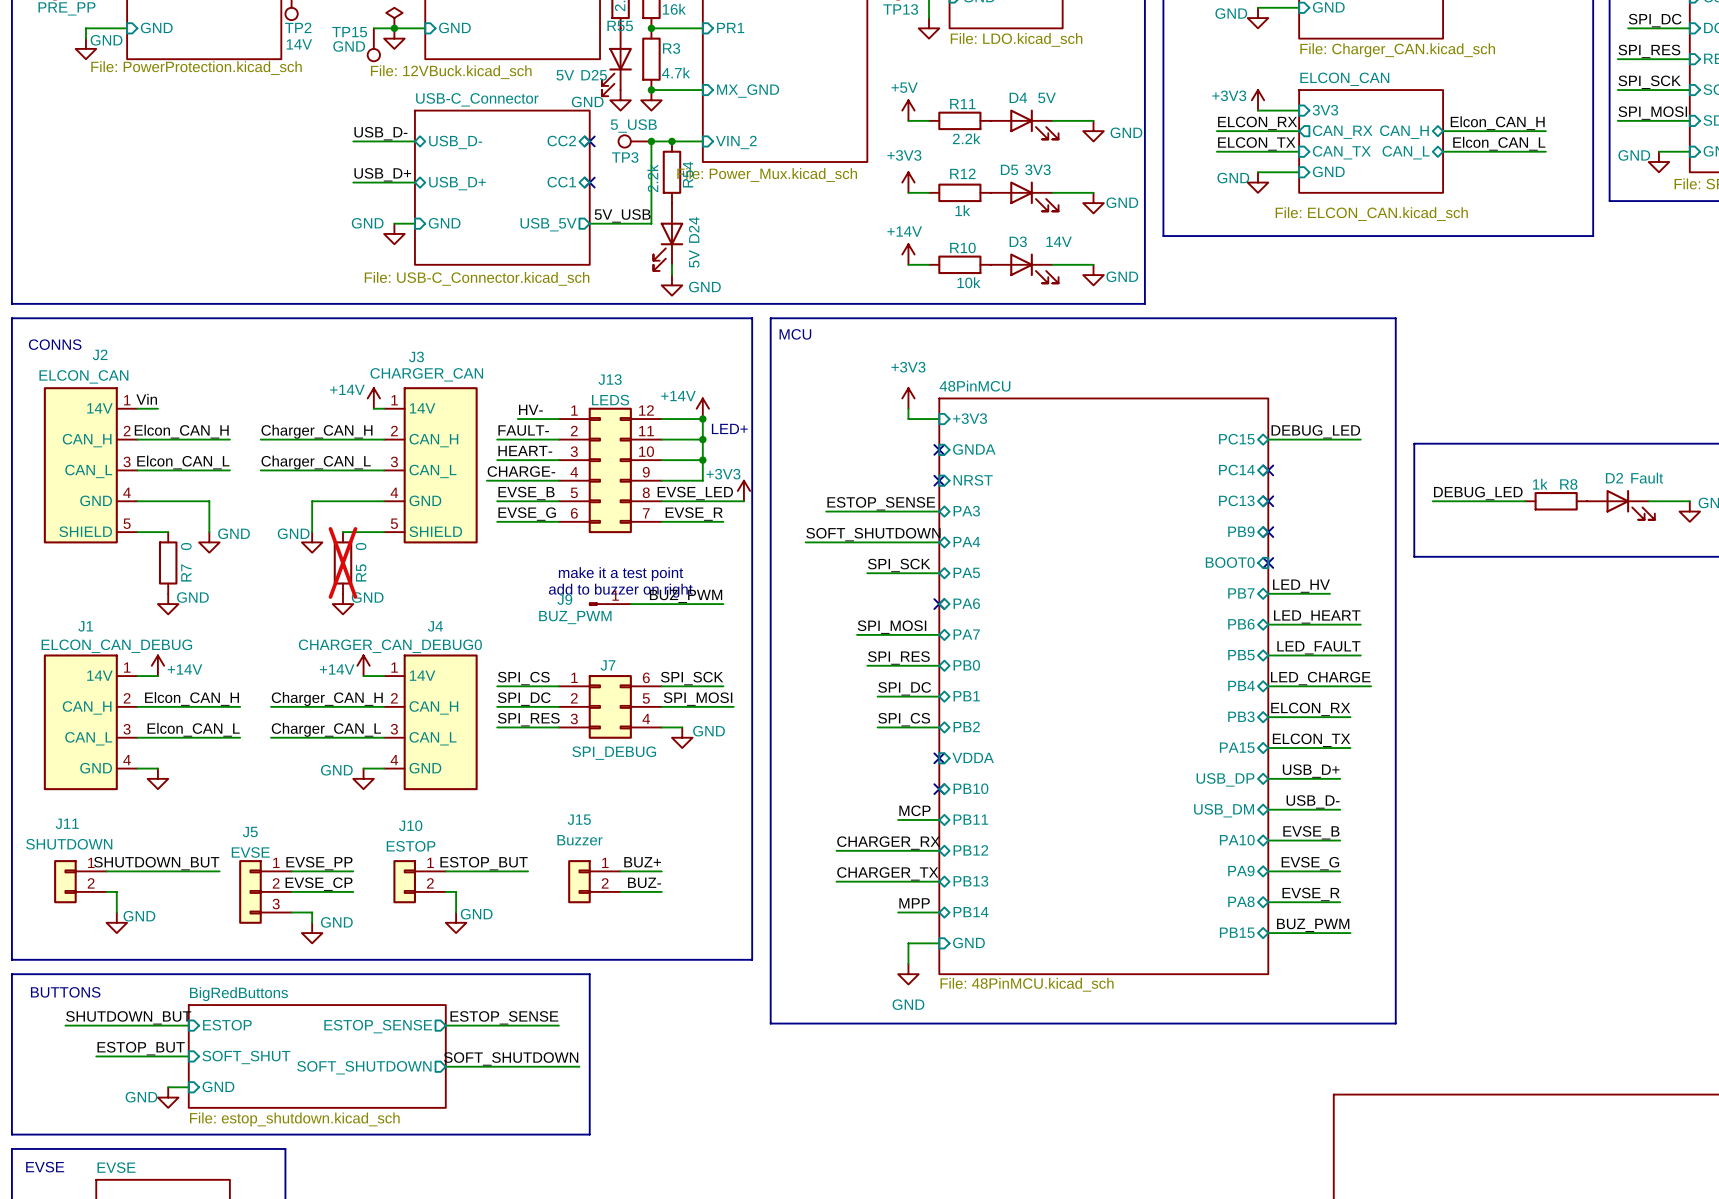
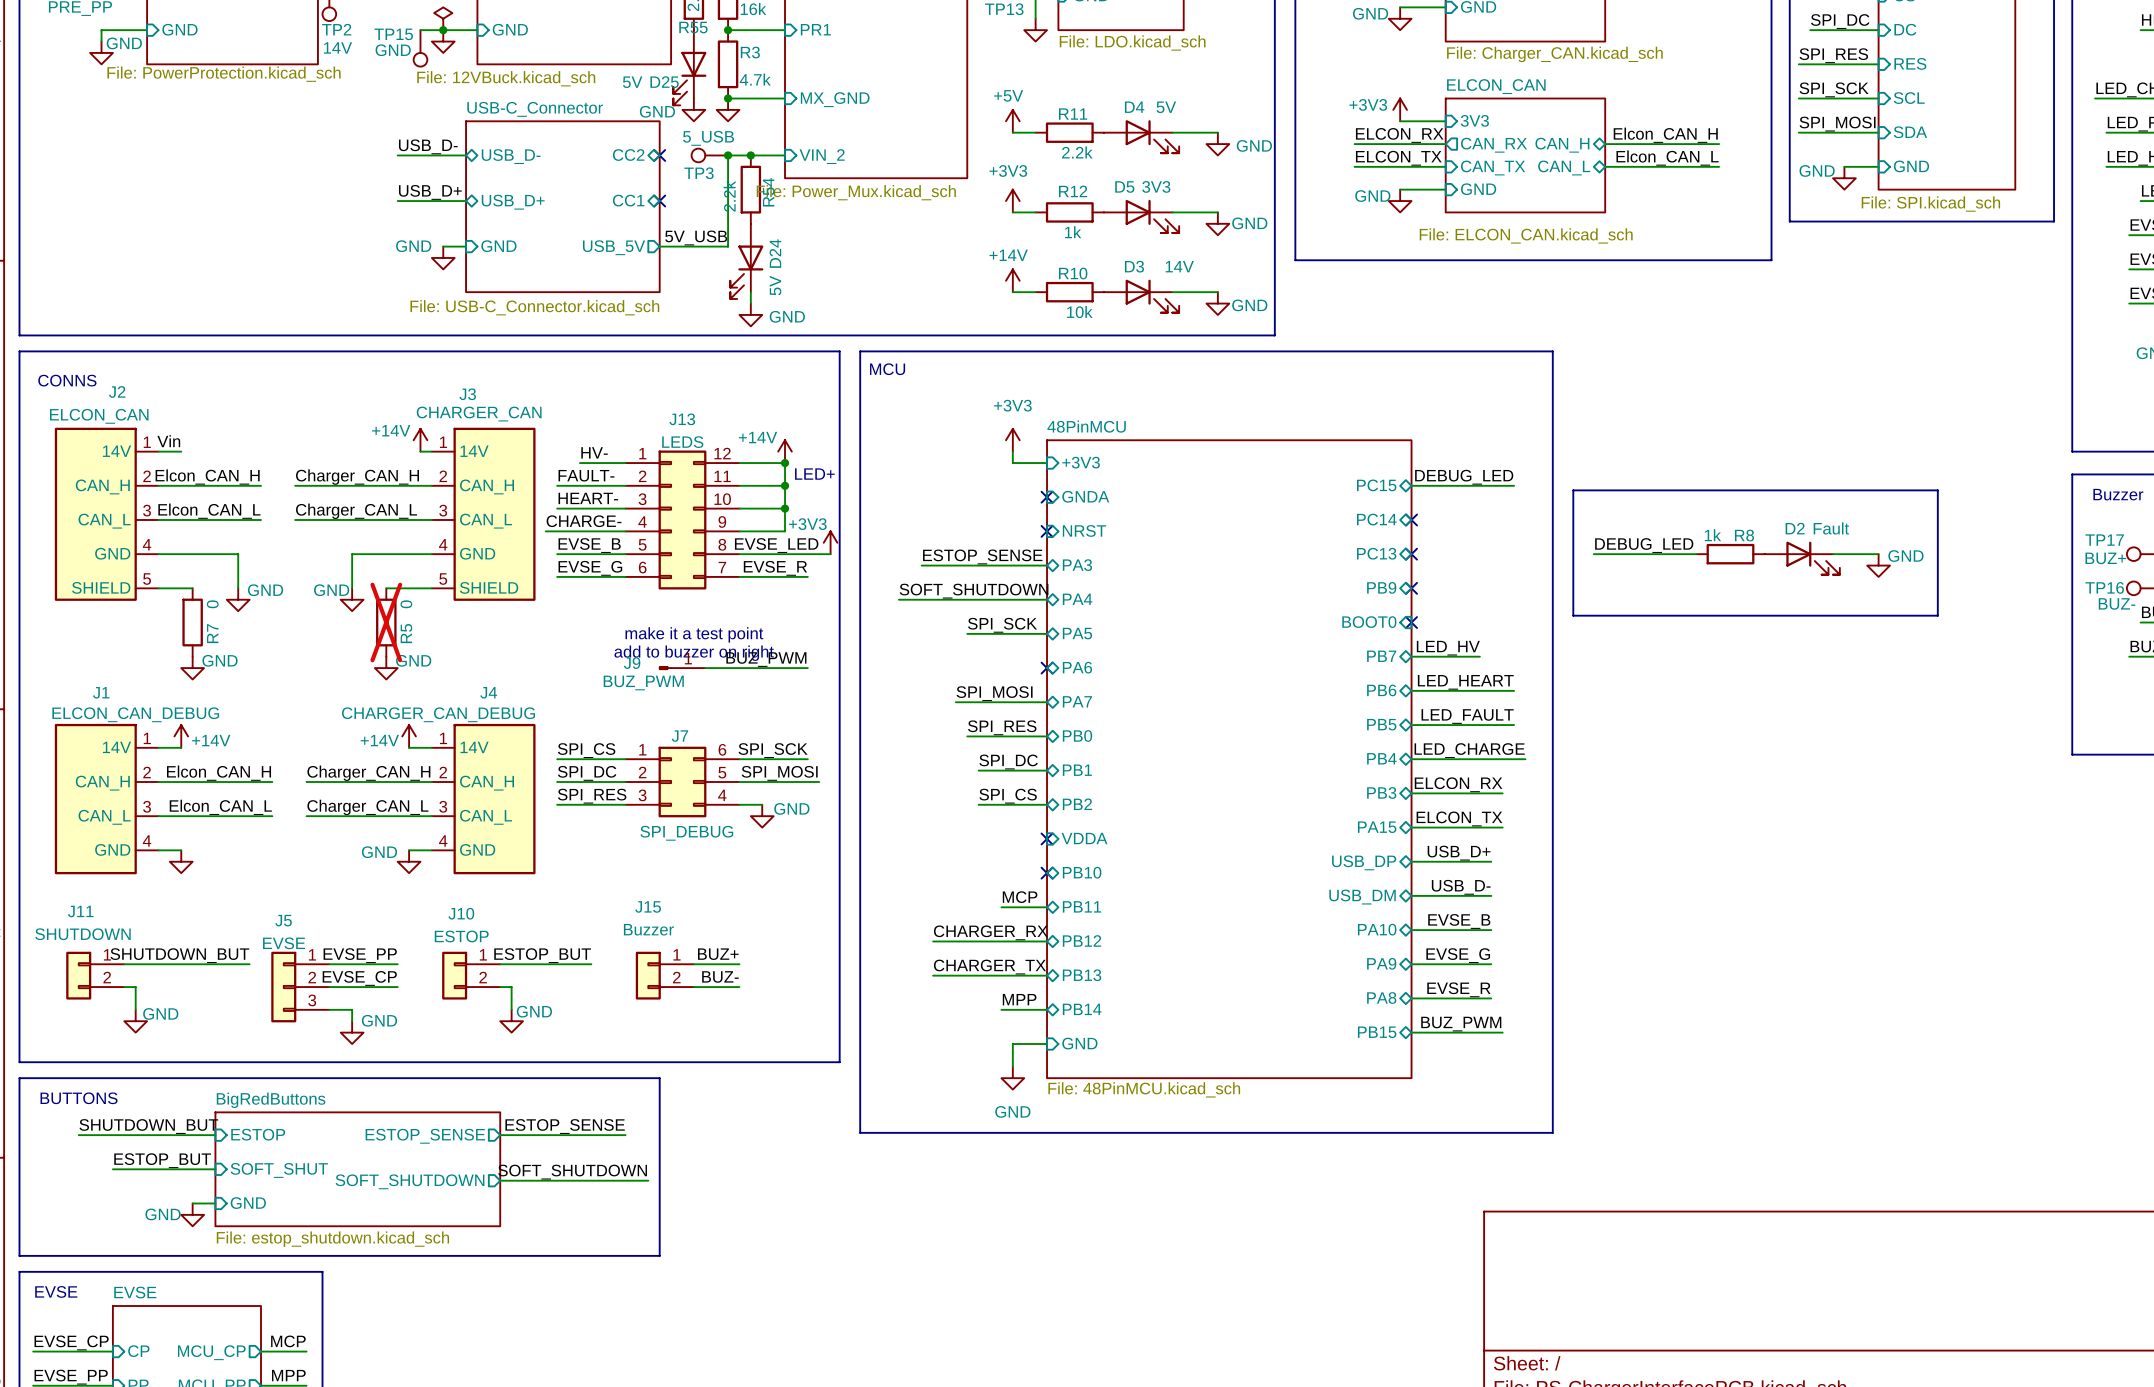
J4 value: CHARGER_CAN_DEBUG0 (390, 646) -> CHARGER_CAN_DEBUG (438, 714)

